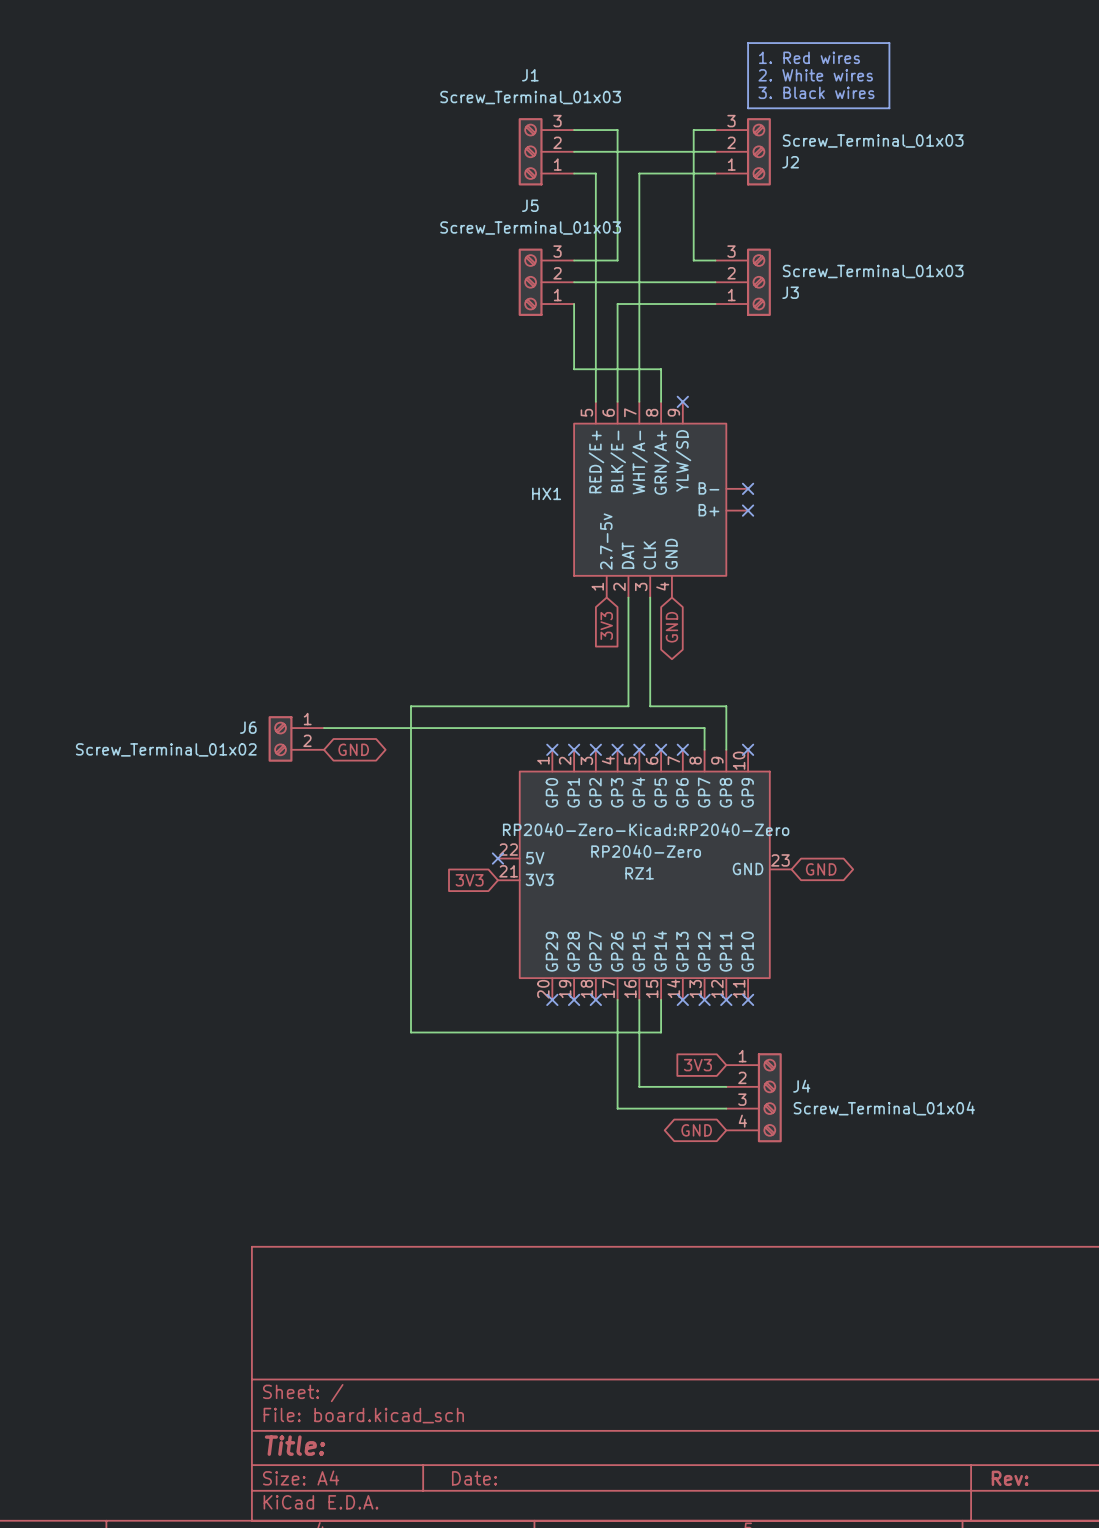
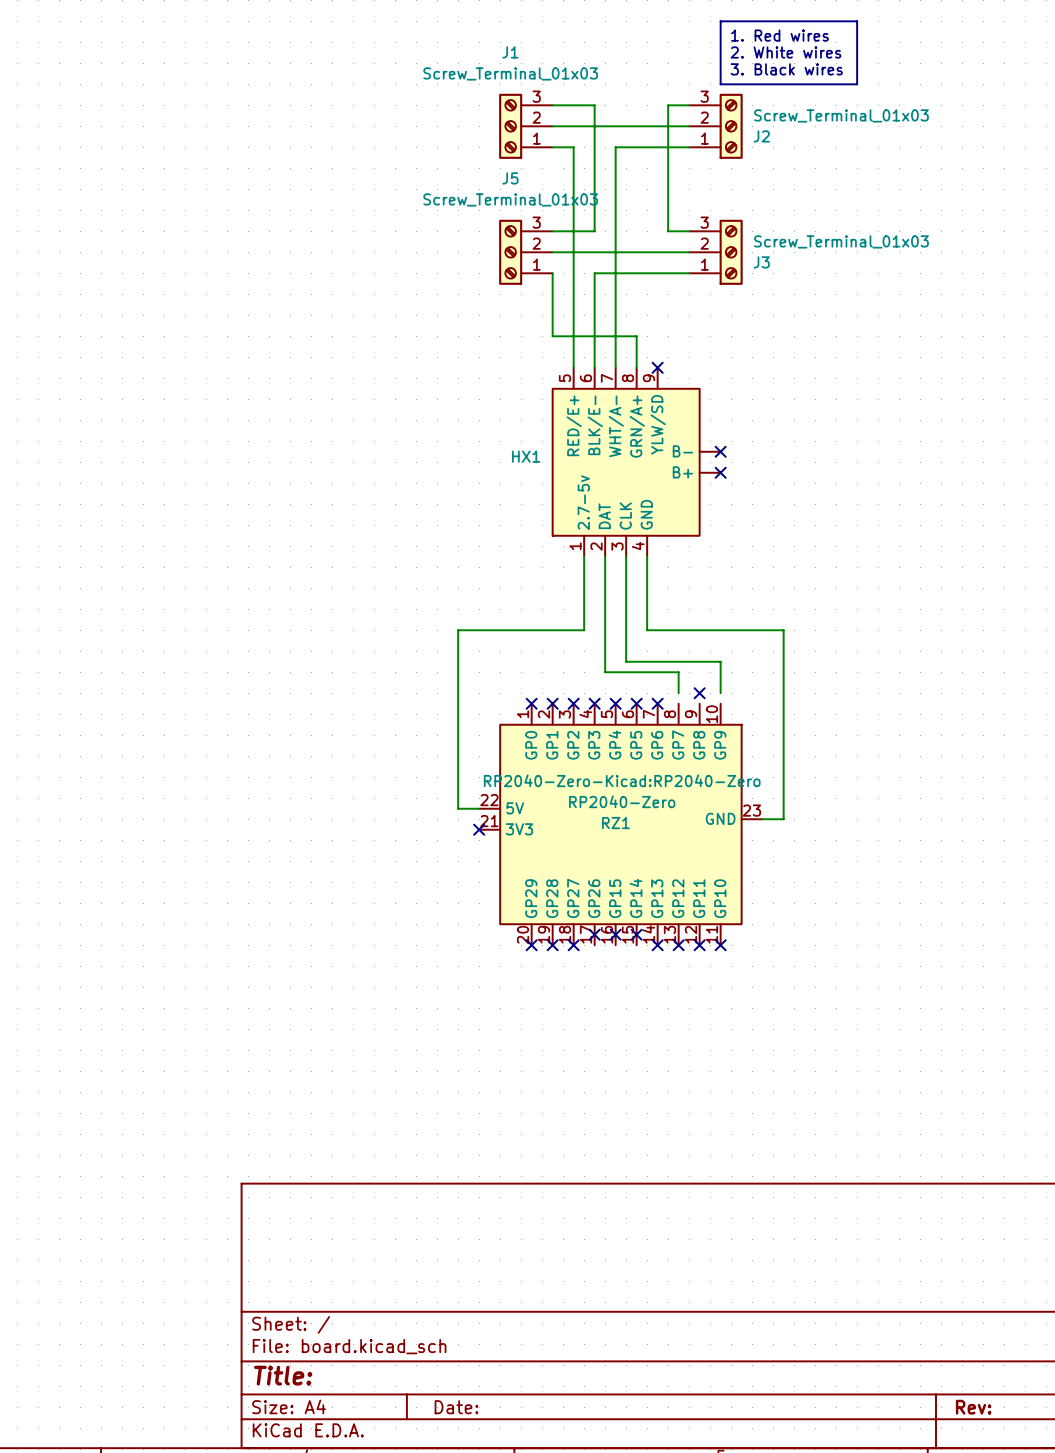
wire: none -> (584, 556) (584, 630) (458, 630) (458, 808) (479, 808)
wire: none -> (647, 556) (647, 630) (783, 630) (783, 819) (762, 819)
global label: 3V3 (606, 625) -> none
global label: GND (671, 627) -> none
wire: (628, 706) (411, 706) (411, 1032) (661, 1032) (661, 999) -> (605, 661) (605, 672) (678, 672) (678, 682)
wire: (726, 706) (726, 749) -> (699, 661) (720, 661) (720, 693)
wire: (324, 728) (704, 728) -> none
J6: Screw_Terminal_01x02 (296, 738) -> none
wire: (704, 738) (704, 749) -> none
global label: GND (353, 749) -> none
no-connect mark position: (748, 749) -> (699, 693)
no-connect mark position: (497, 858) -> (479, 829)
global label: GND (821, 869) -> none
global label: 3V3 (469, 880) -> none
no-connect mark: none -> (594, 934)
no-connect mark: none -> (615, 934)
no-connect mark: none -> (636, 934)
wire: (617, 999) (617, 1108) (726, 1108) -> none
wire: (639, 999) (639, 1086) (726, 1086) -> none
global label: 3V3 (697, 1065) -> none
J4: Screw_Terminal_01x04 (754, 1097) -> none
global label: GND (696, 1130) -> none

